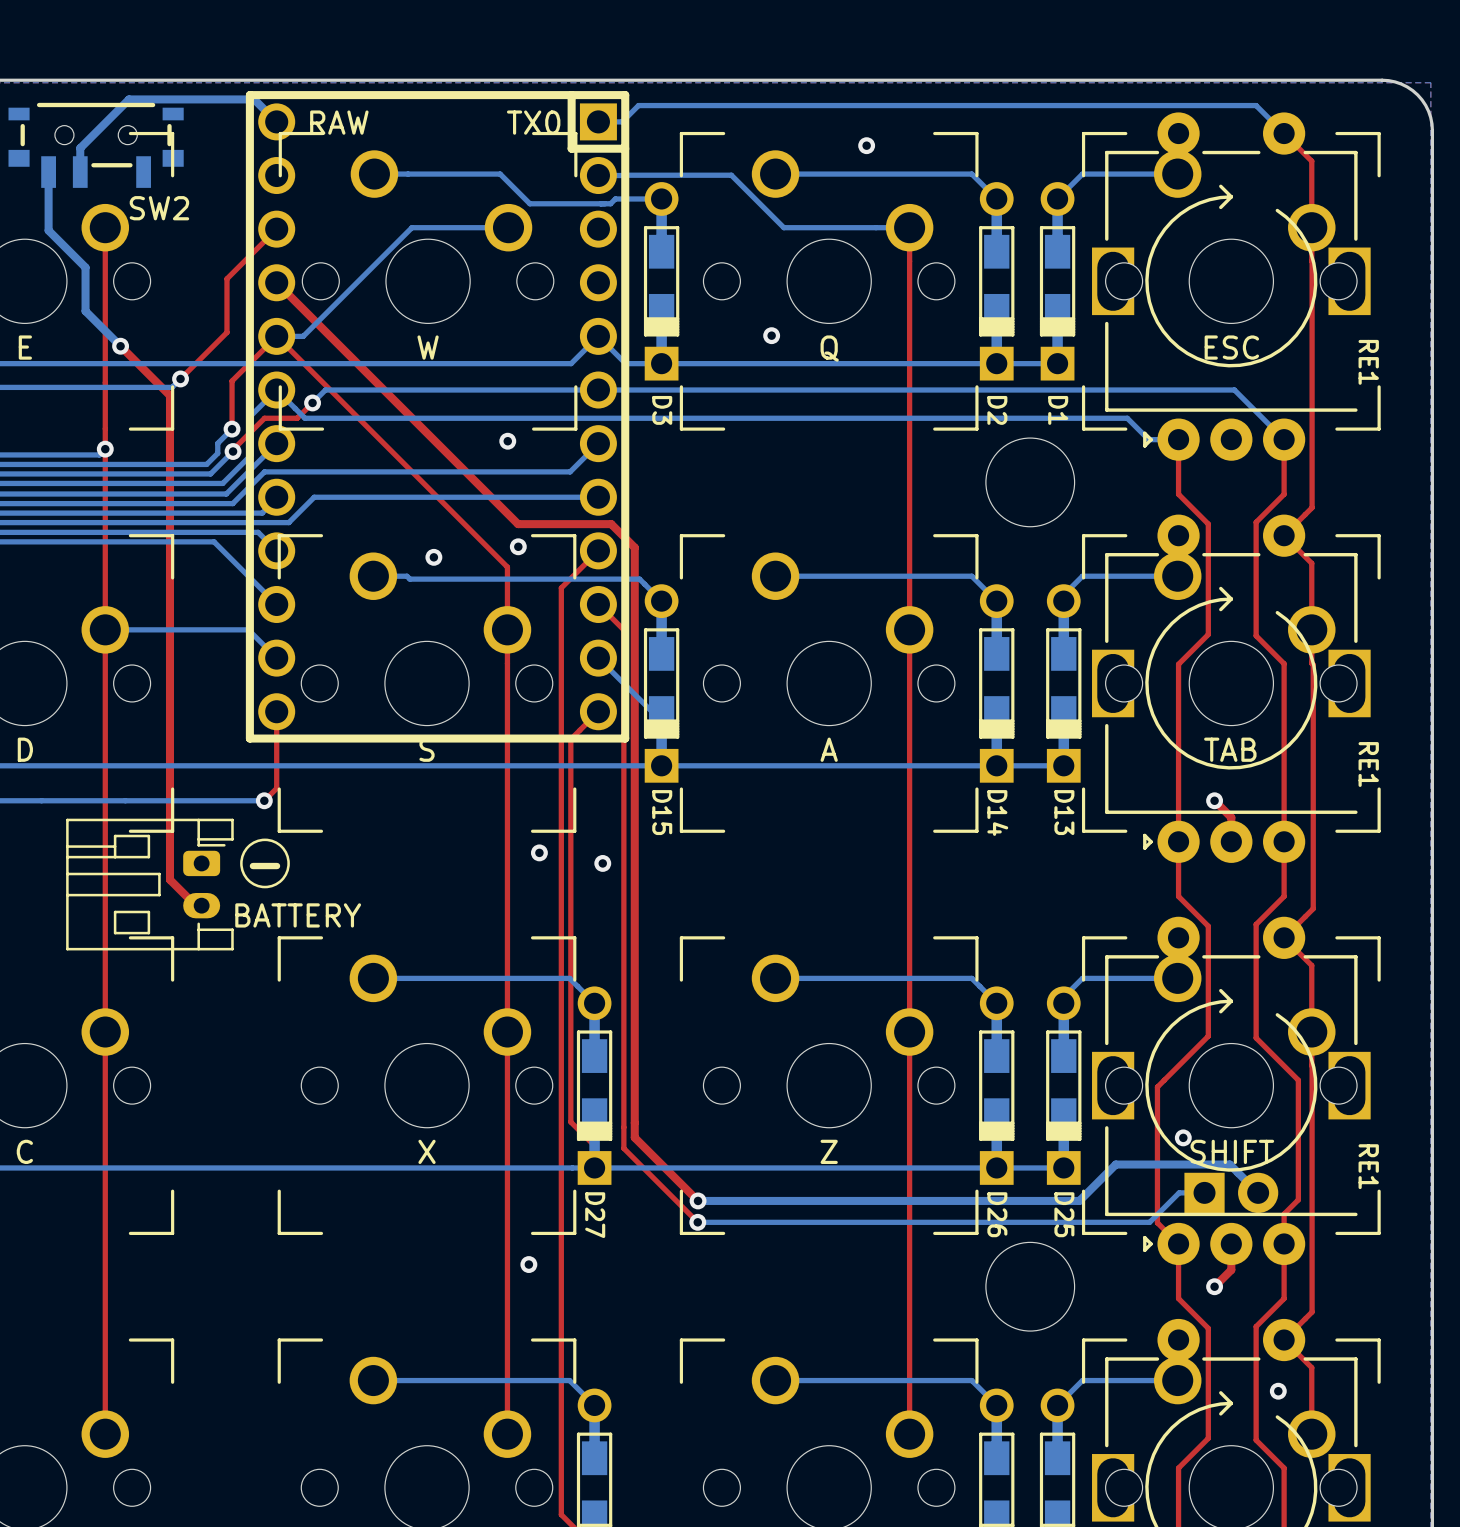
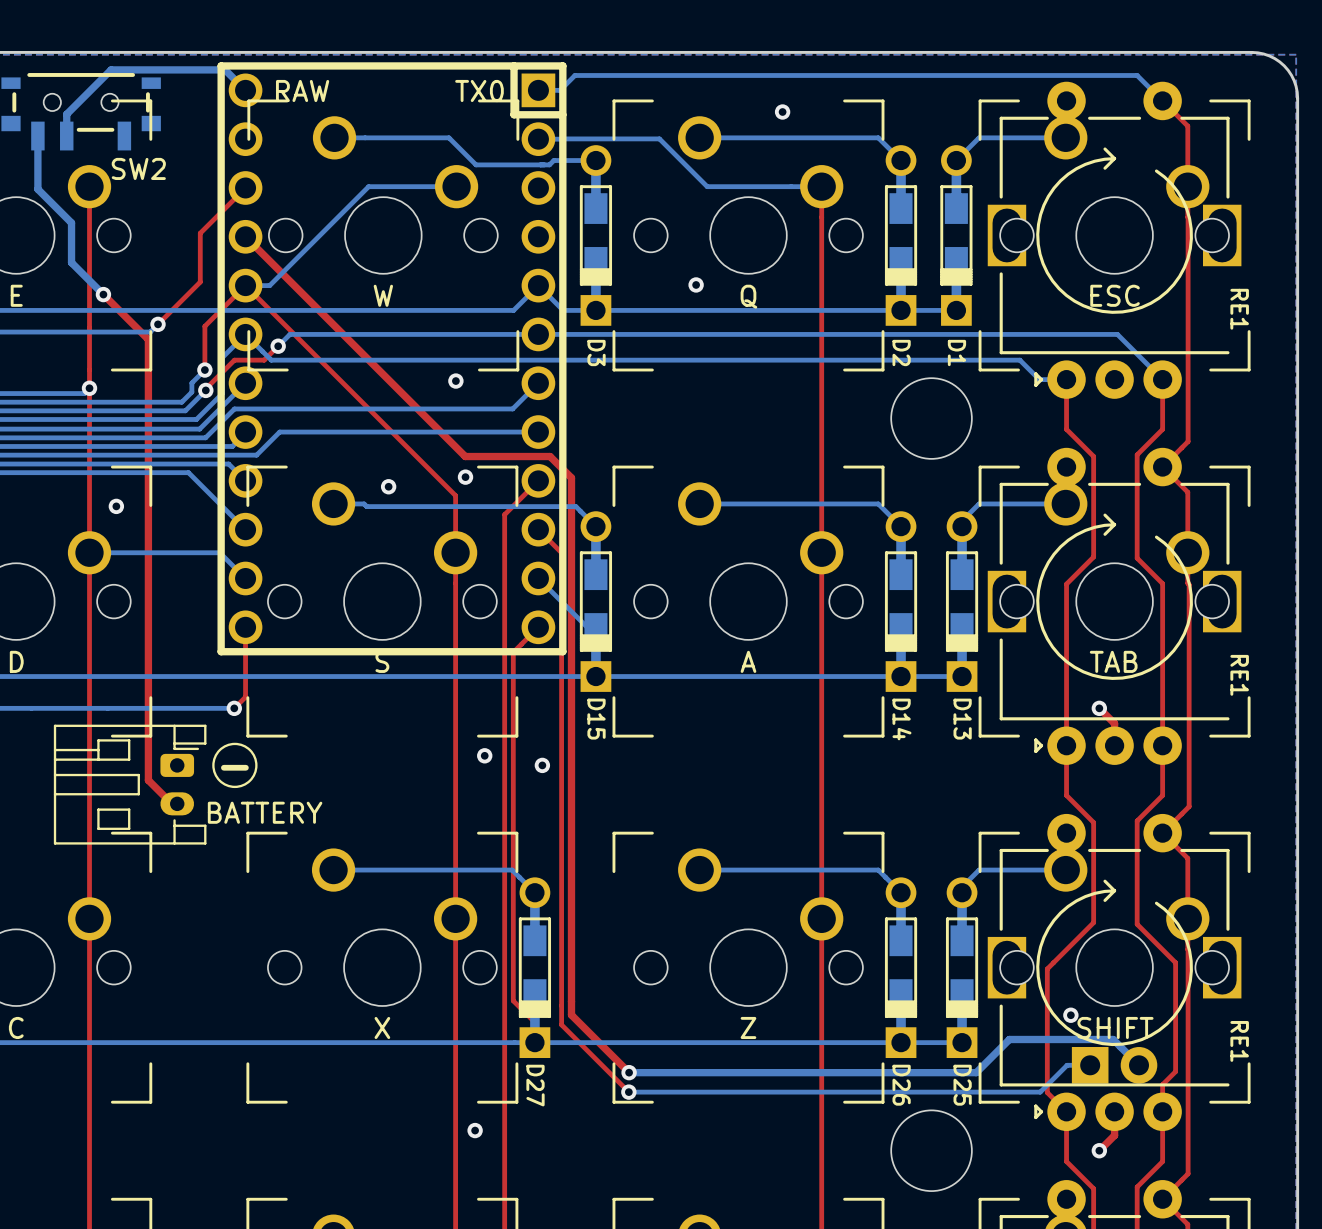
via: none -> (116, 506)

